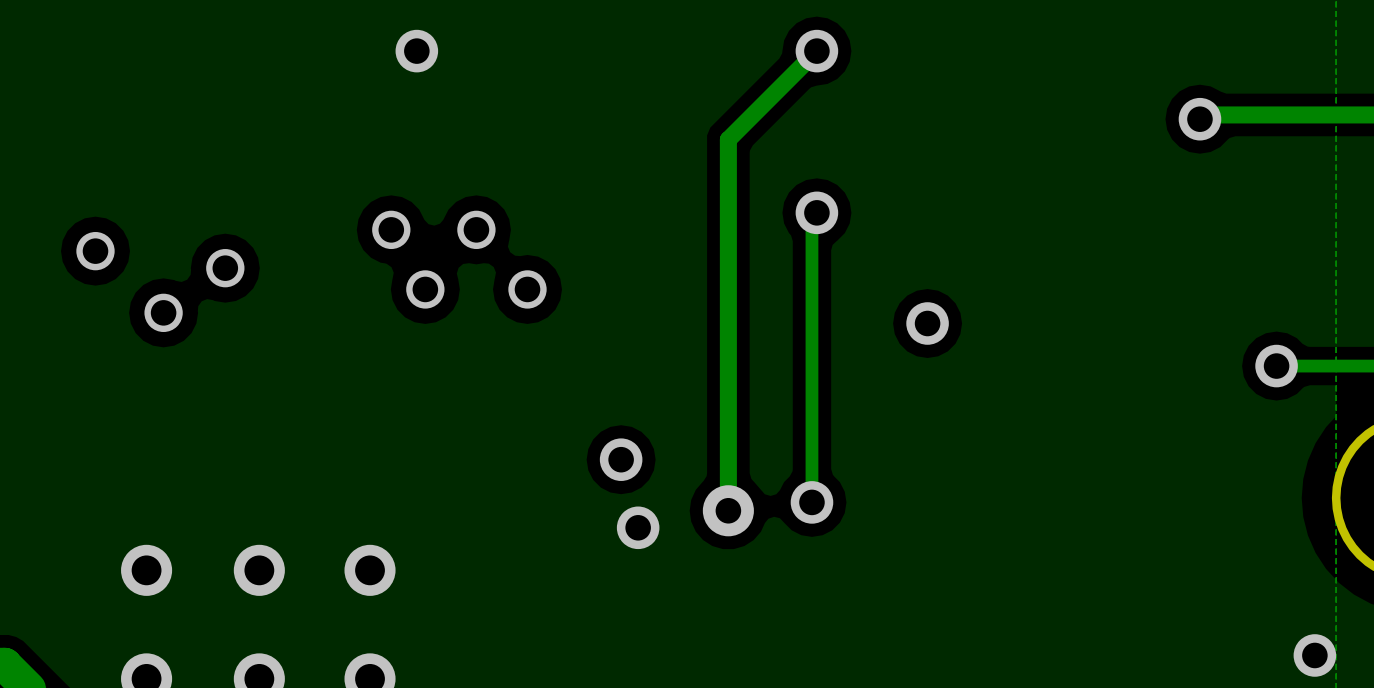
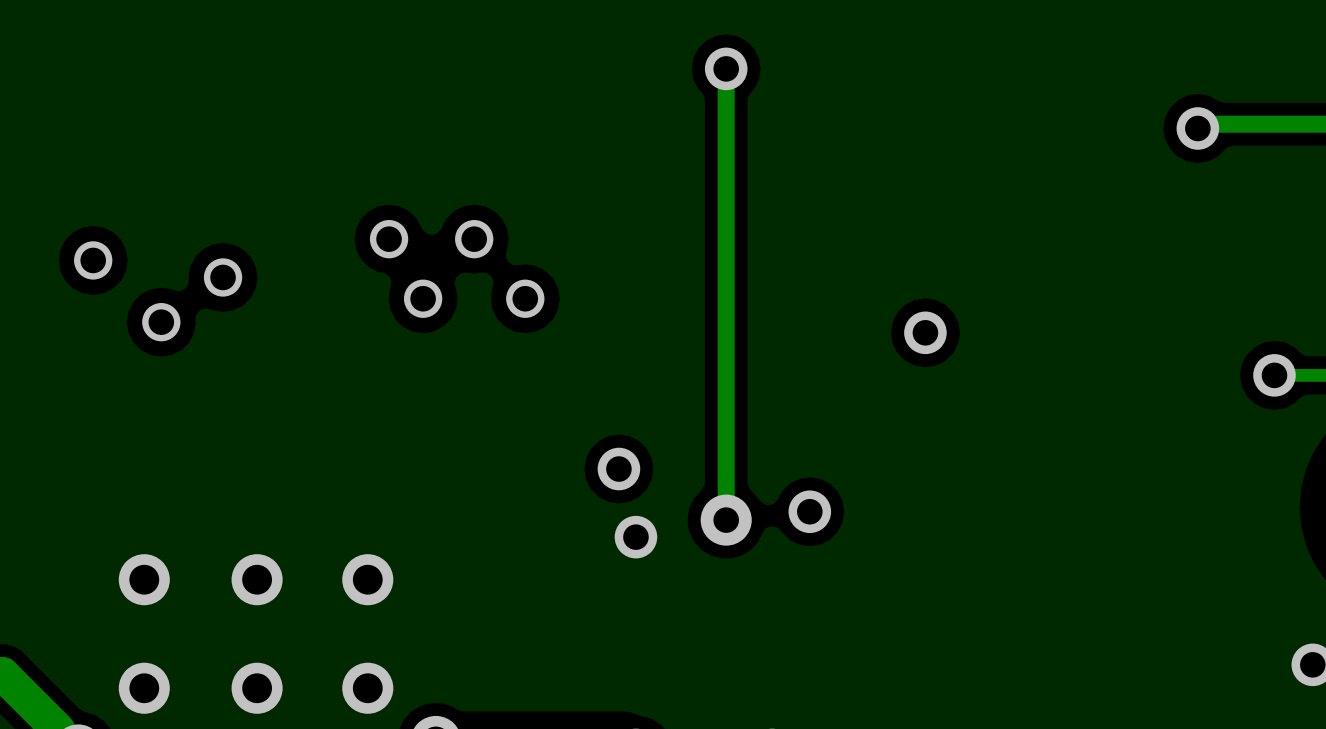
via: (416, 51) -> none
track: (816, 51) (728, 139) -> (726, 68) (726, 148)
via: (816, 51) -> none
via: none -> (726, 68)
track: (816, 212) (811, 217) (811, 502) -> none
via: (816, 212) -> none

